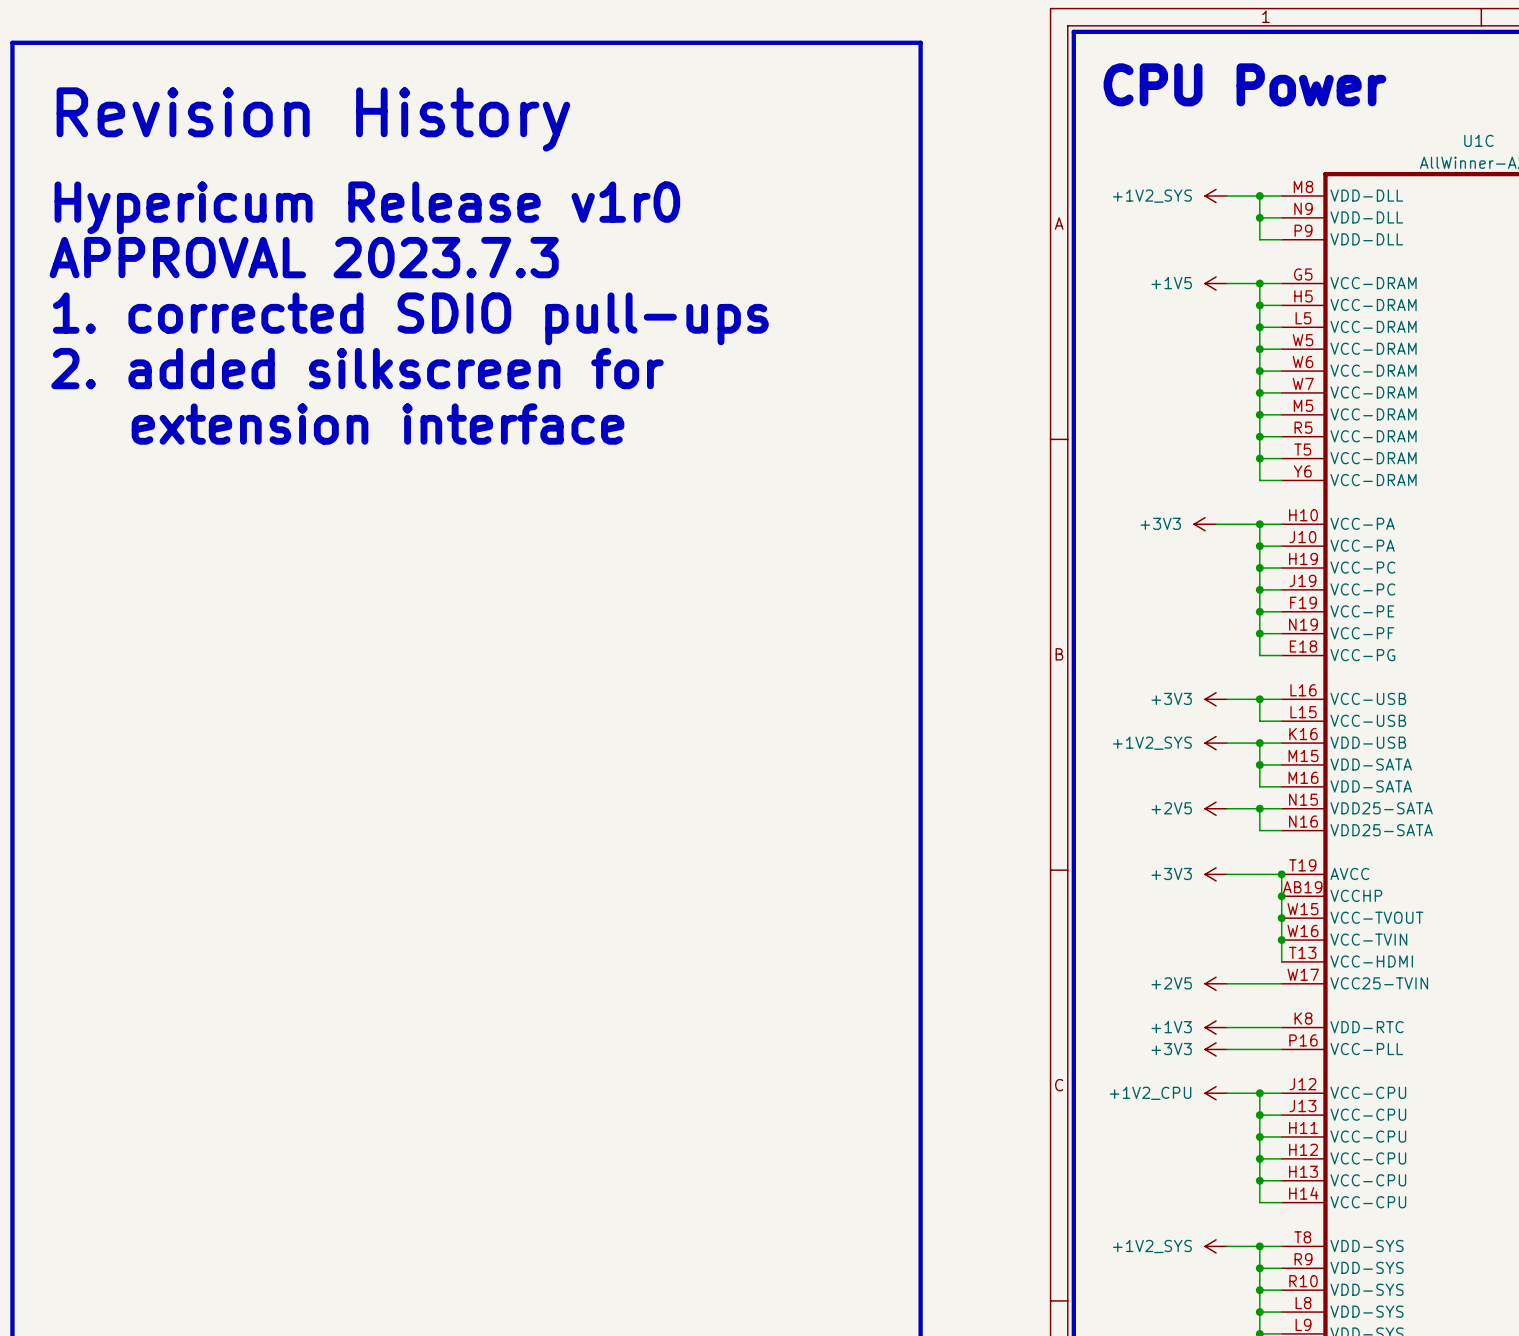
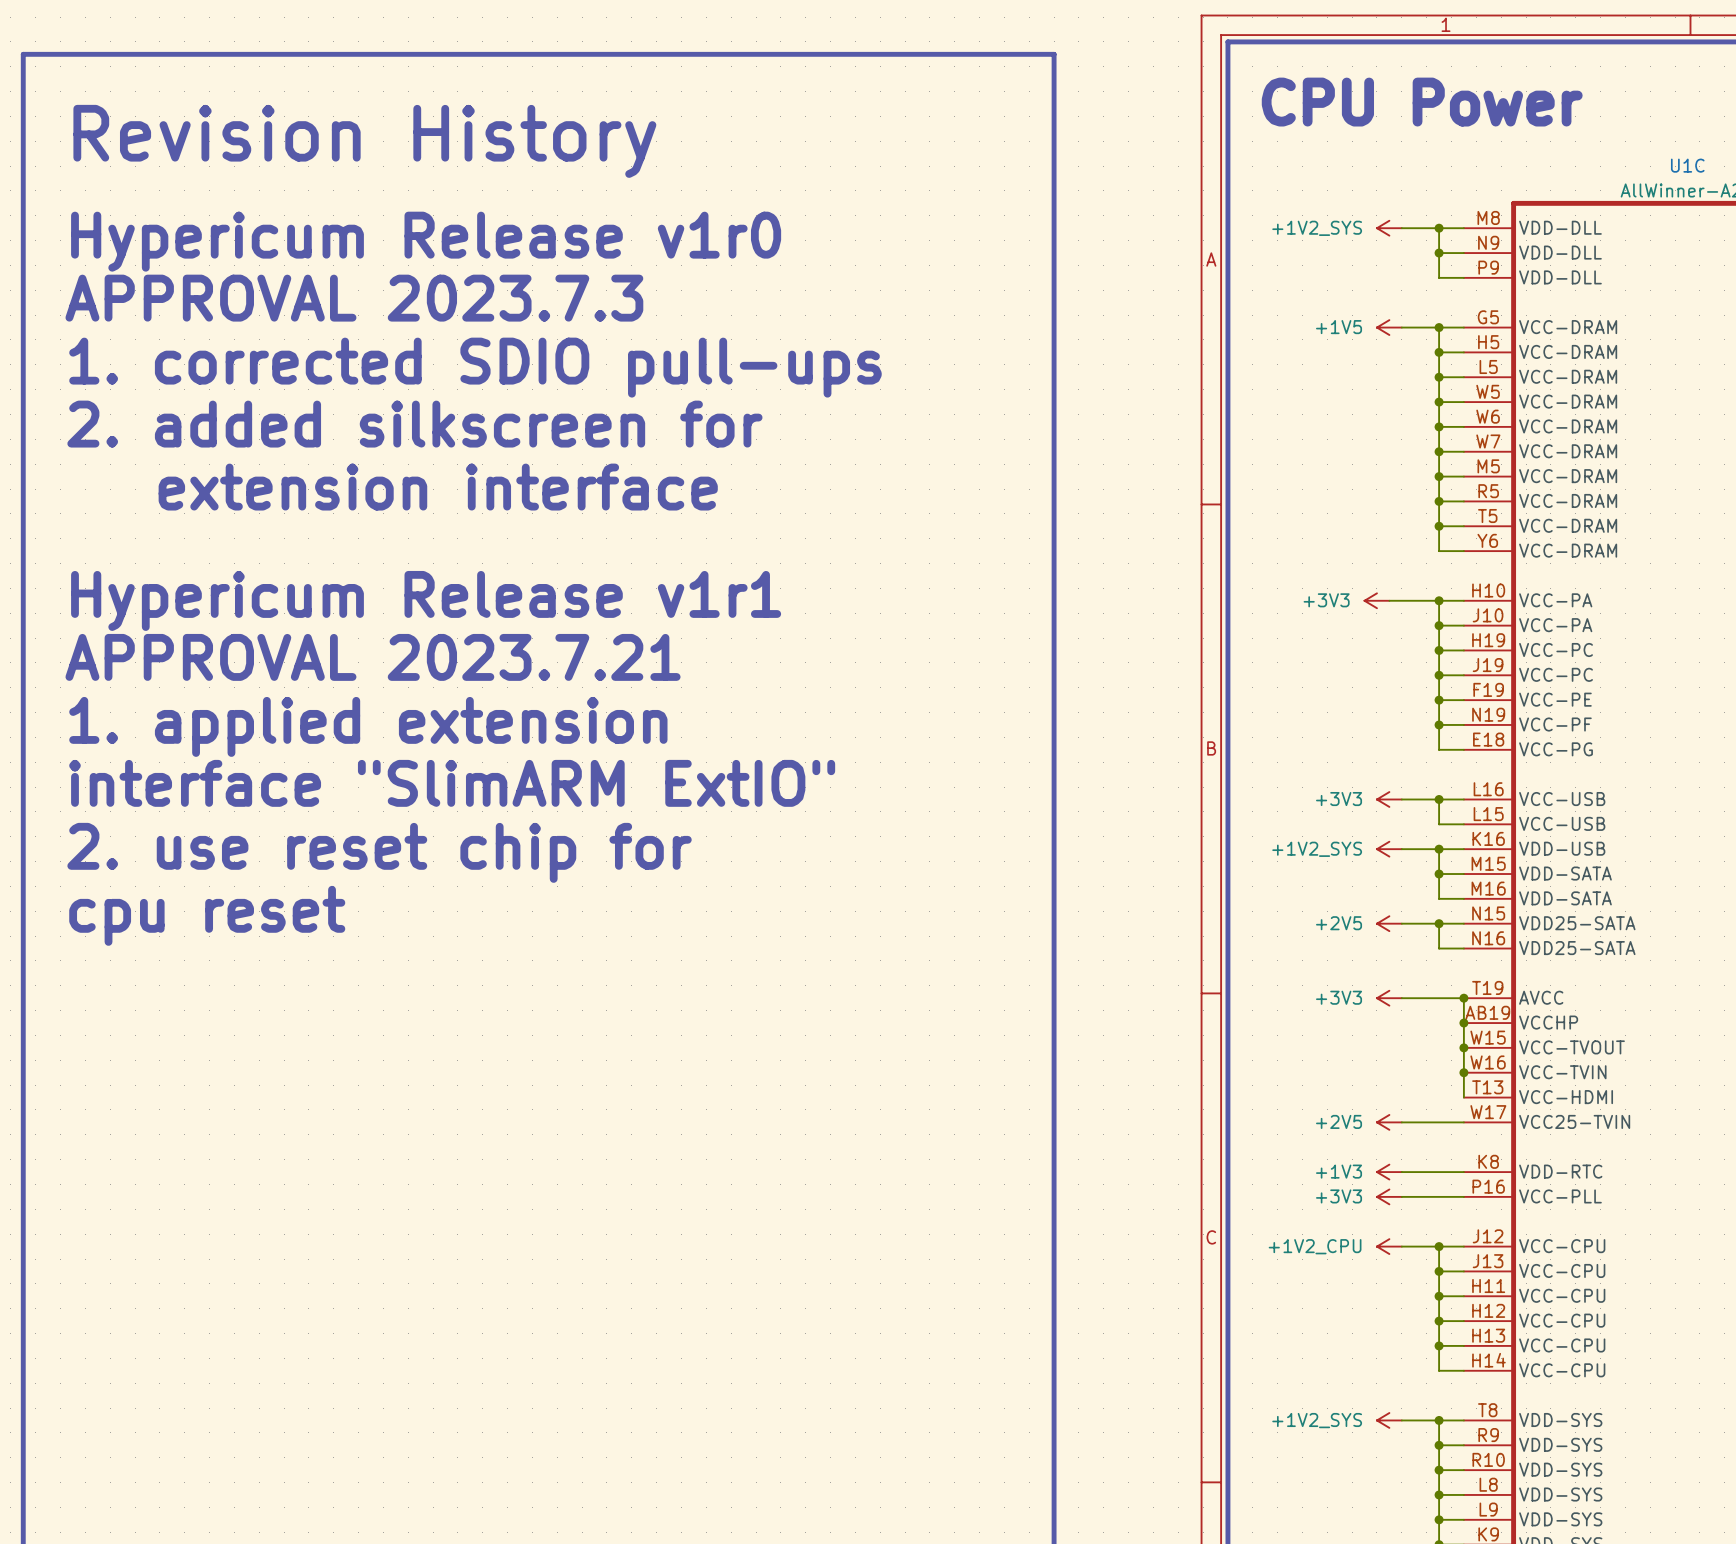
text: none -> Hypericum Release v1r1 (426, 600)
text: none -> APPROVAL 2023.7.21 (373, 657)
text: none -> 1. applied extension (368, 726)
text: none -> interface "SlimARM ExtIO" (452, 783)
text: none -> 2. use reset chip for (379, 852)
text: none -> cpu reset (207, 915)

